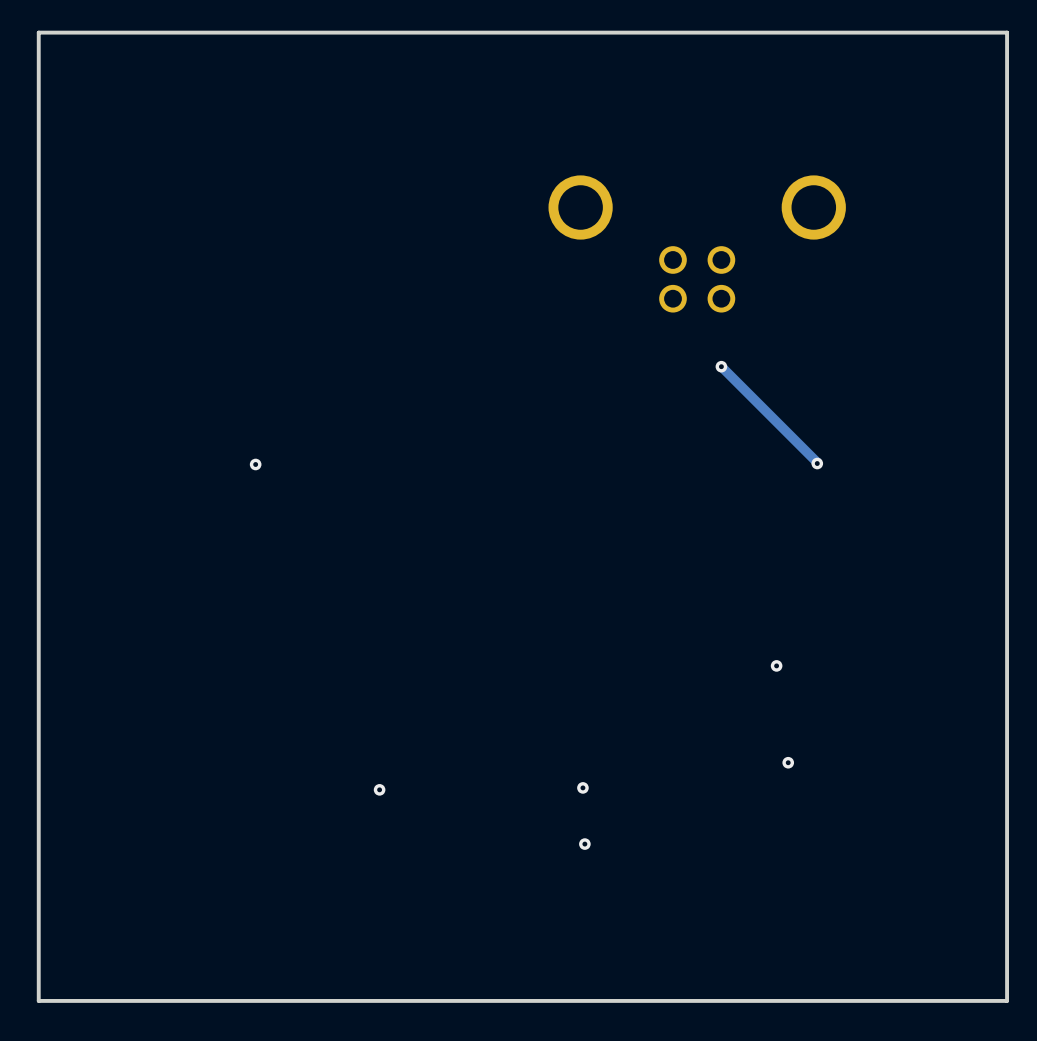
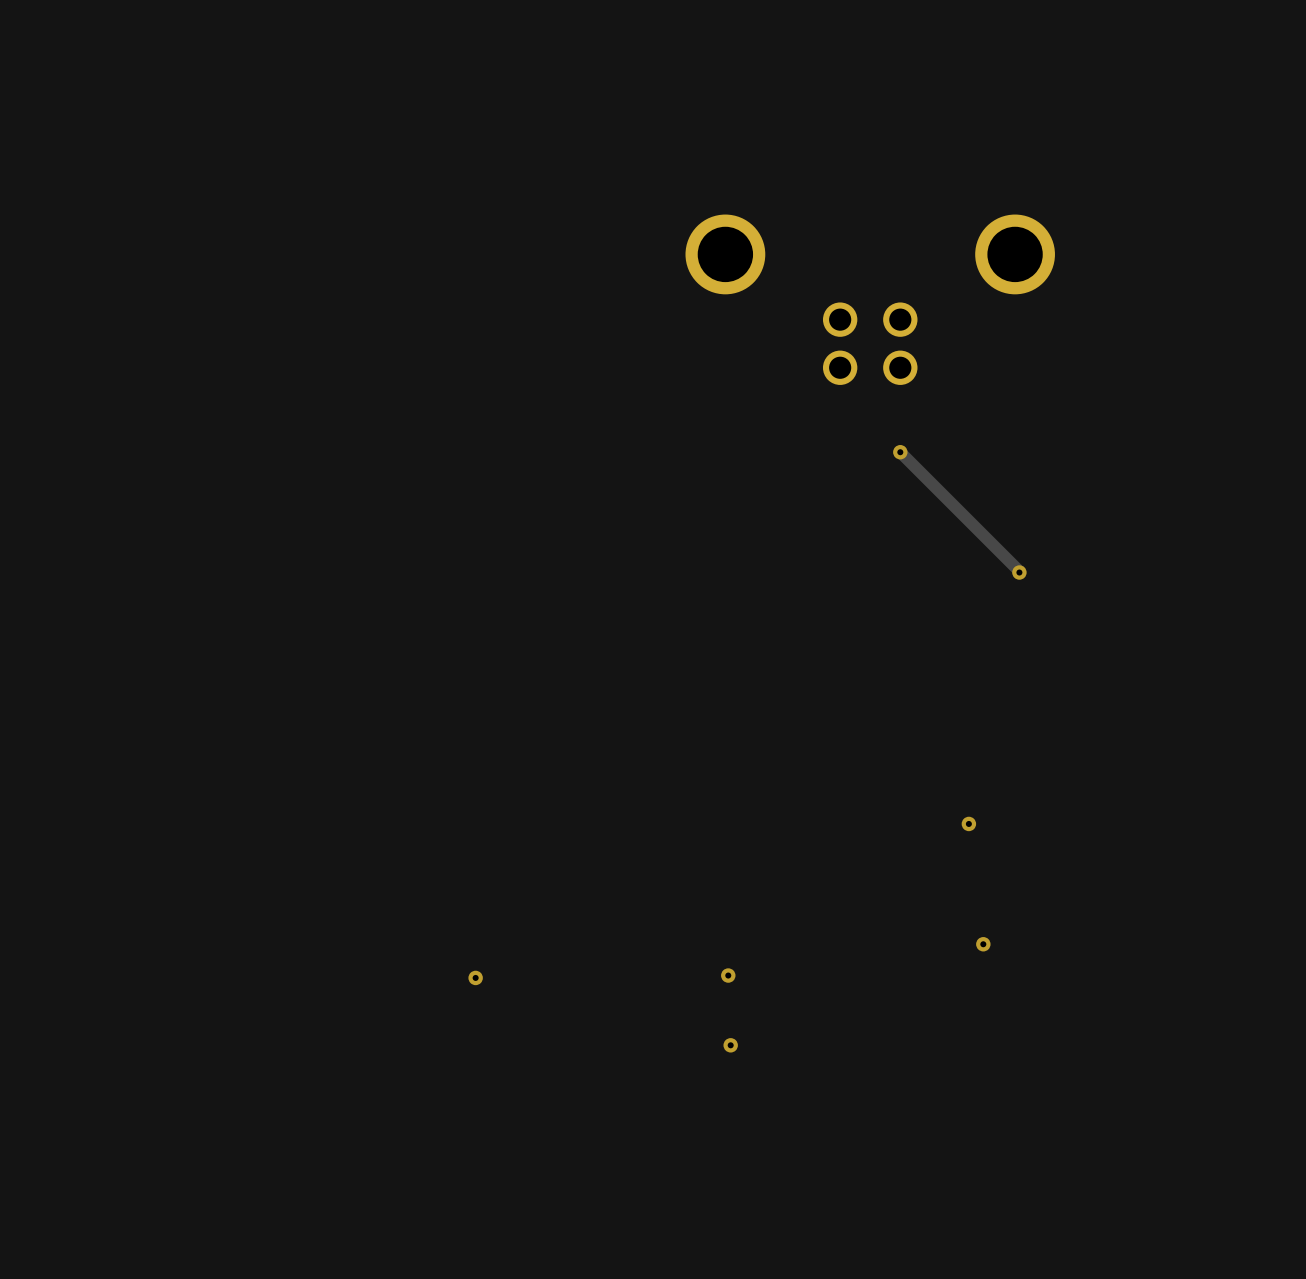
board edge: (1007, 32) (38, 32) (38, 1000) (1007, 1000) (1007, 32) -> none
via: (255, 464) -> none

